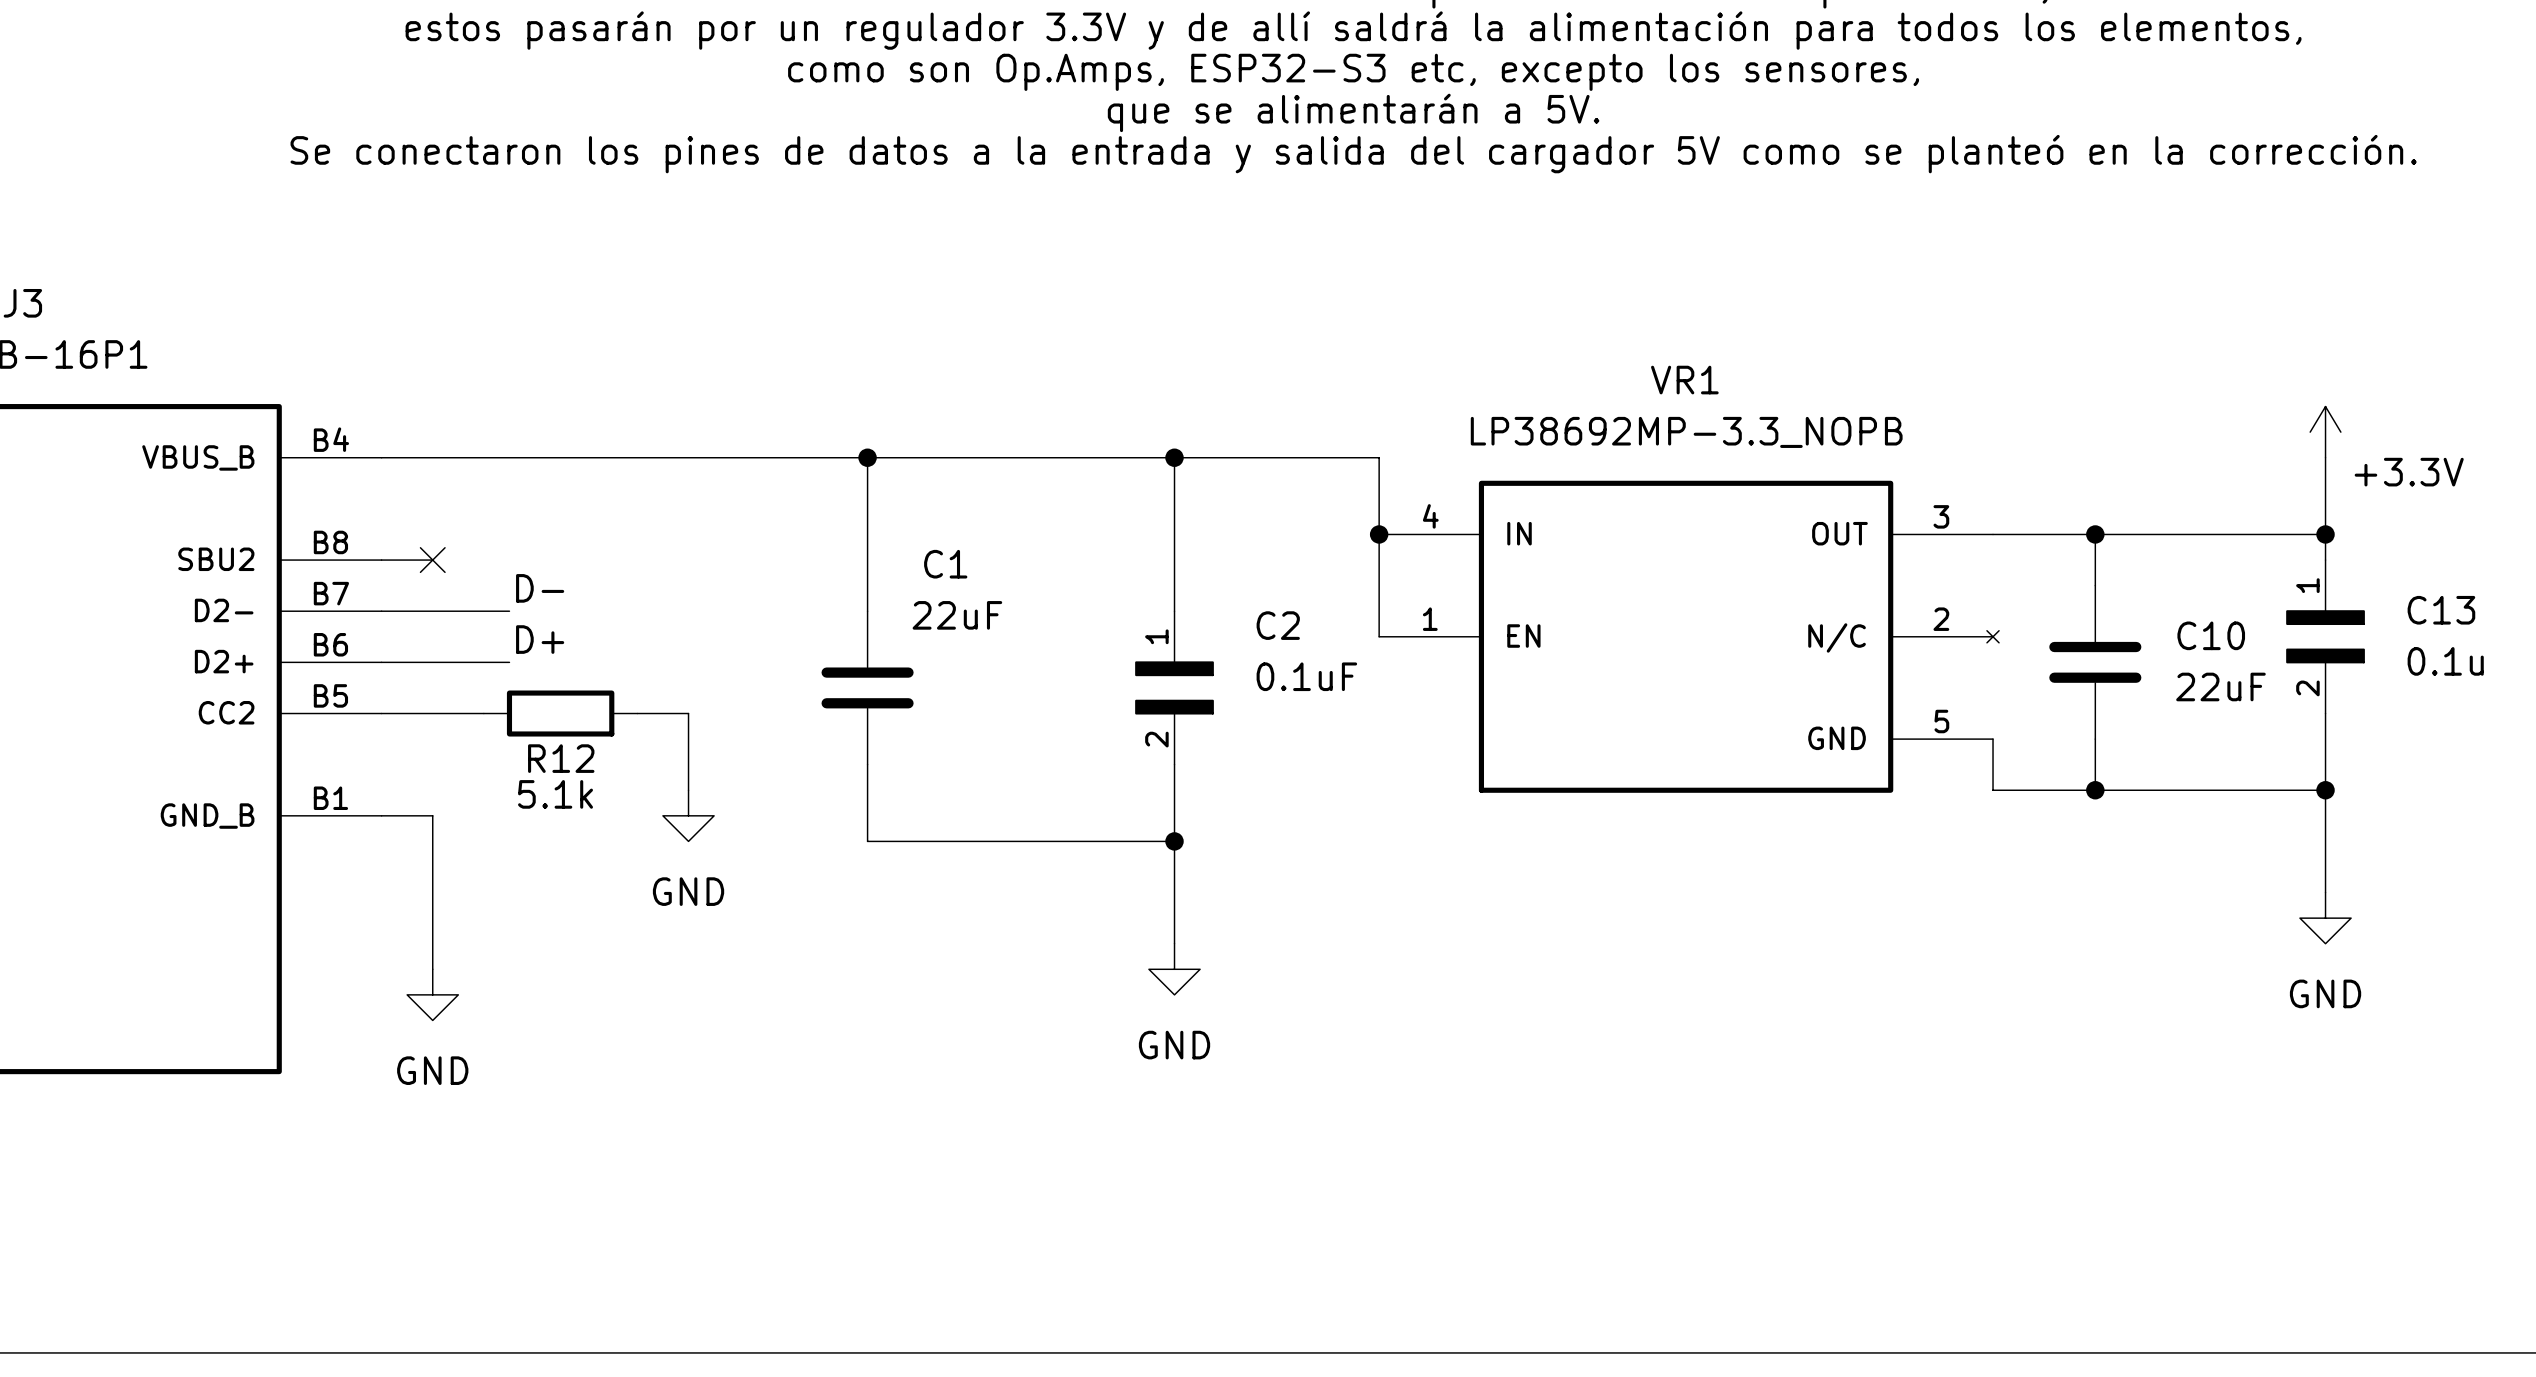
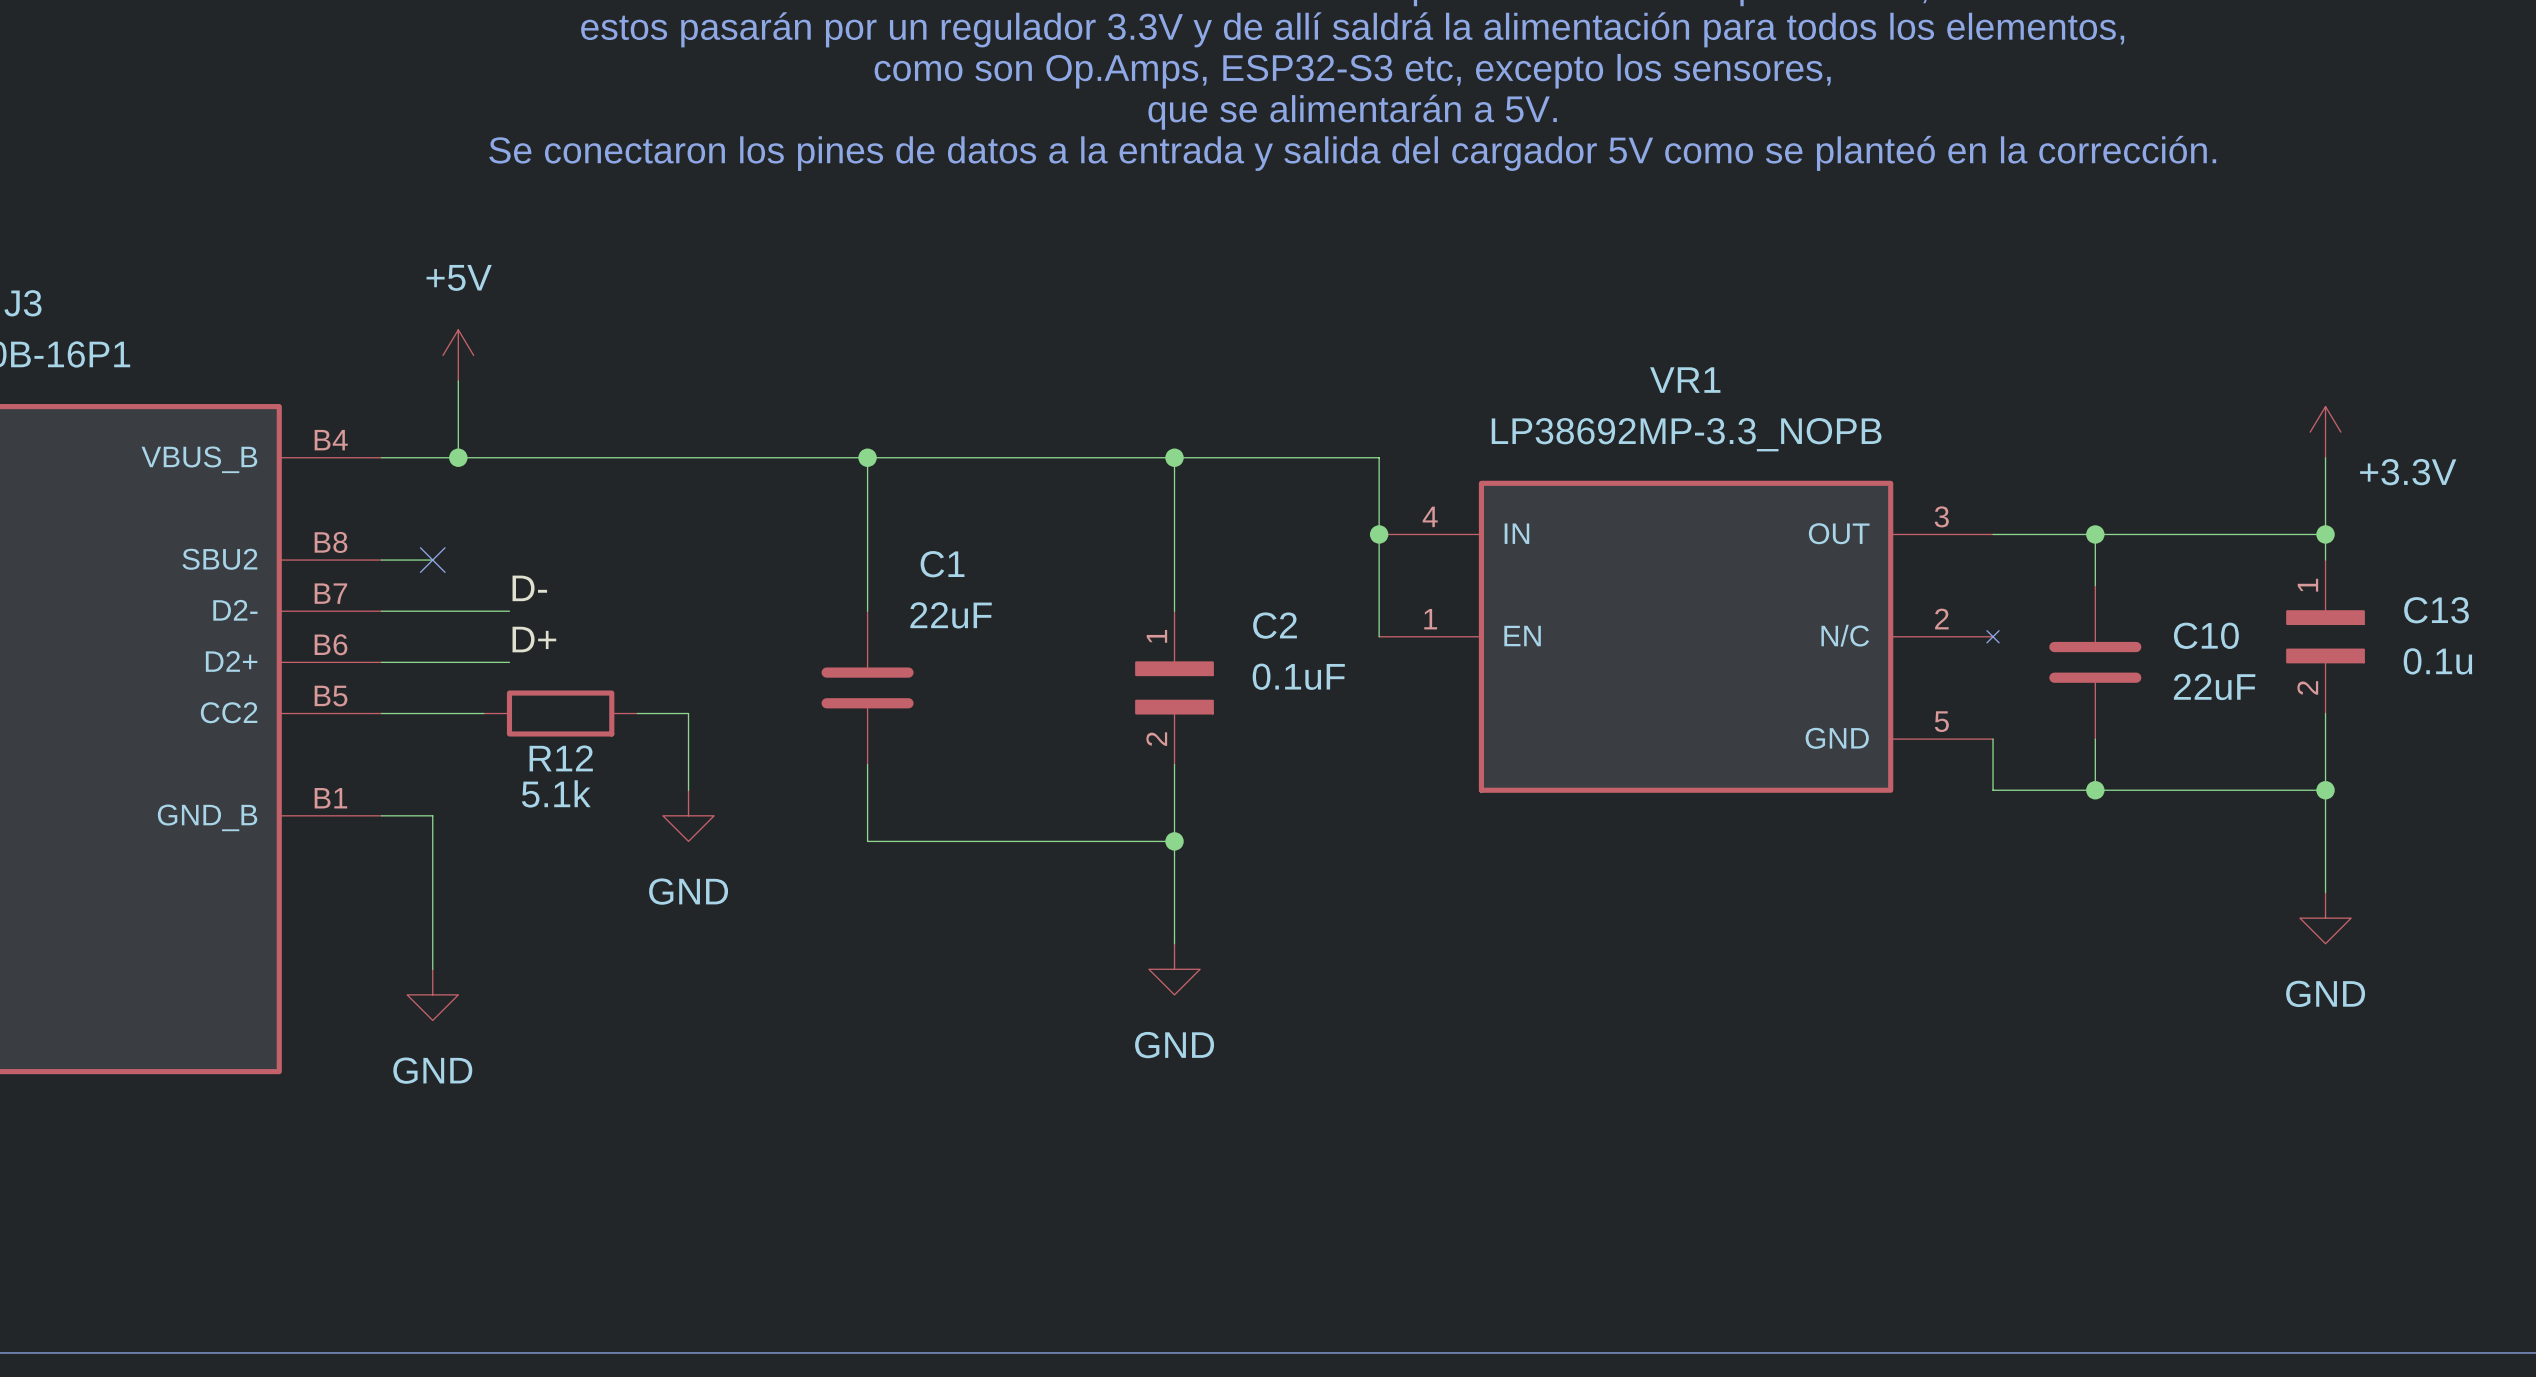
power symbol: none -> +5V (458, 355)
wire: none -> (458, 381) (458, 457)
junction: none -> (458, 457)

